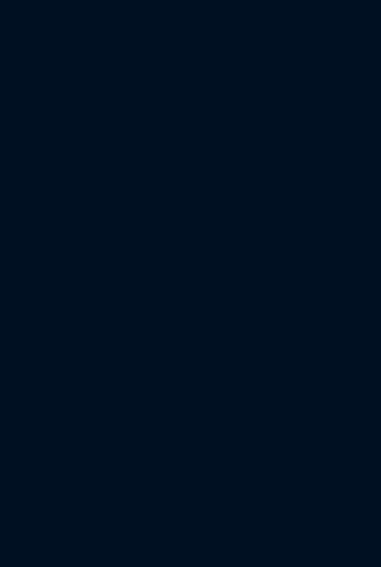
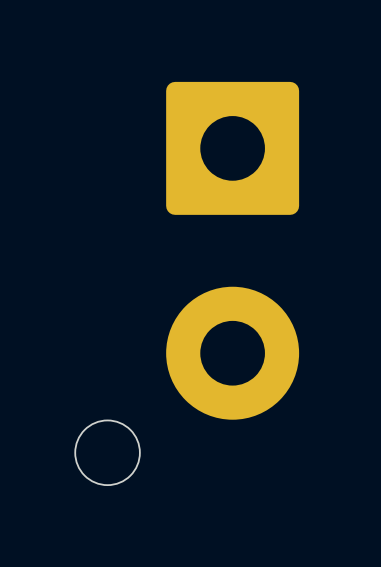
part: none -> (187, 283)

